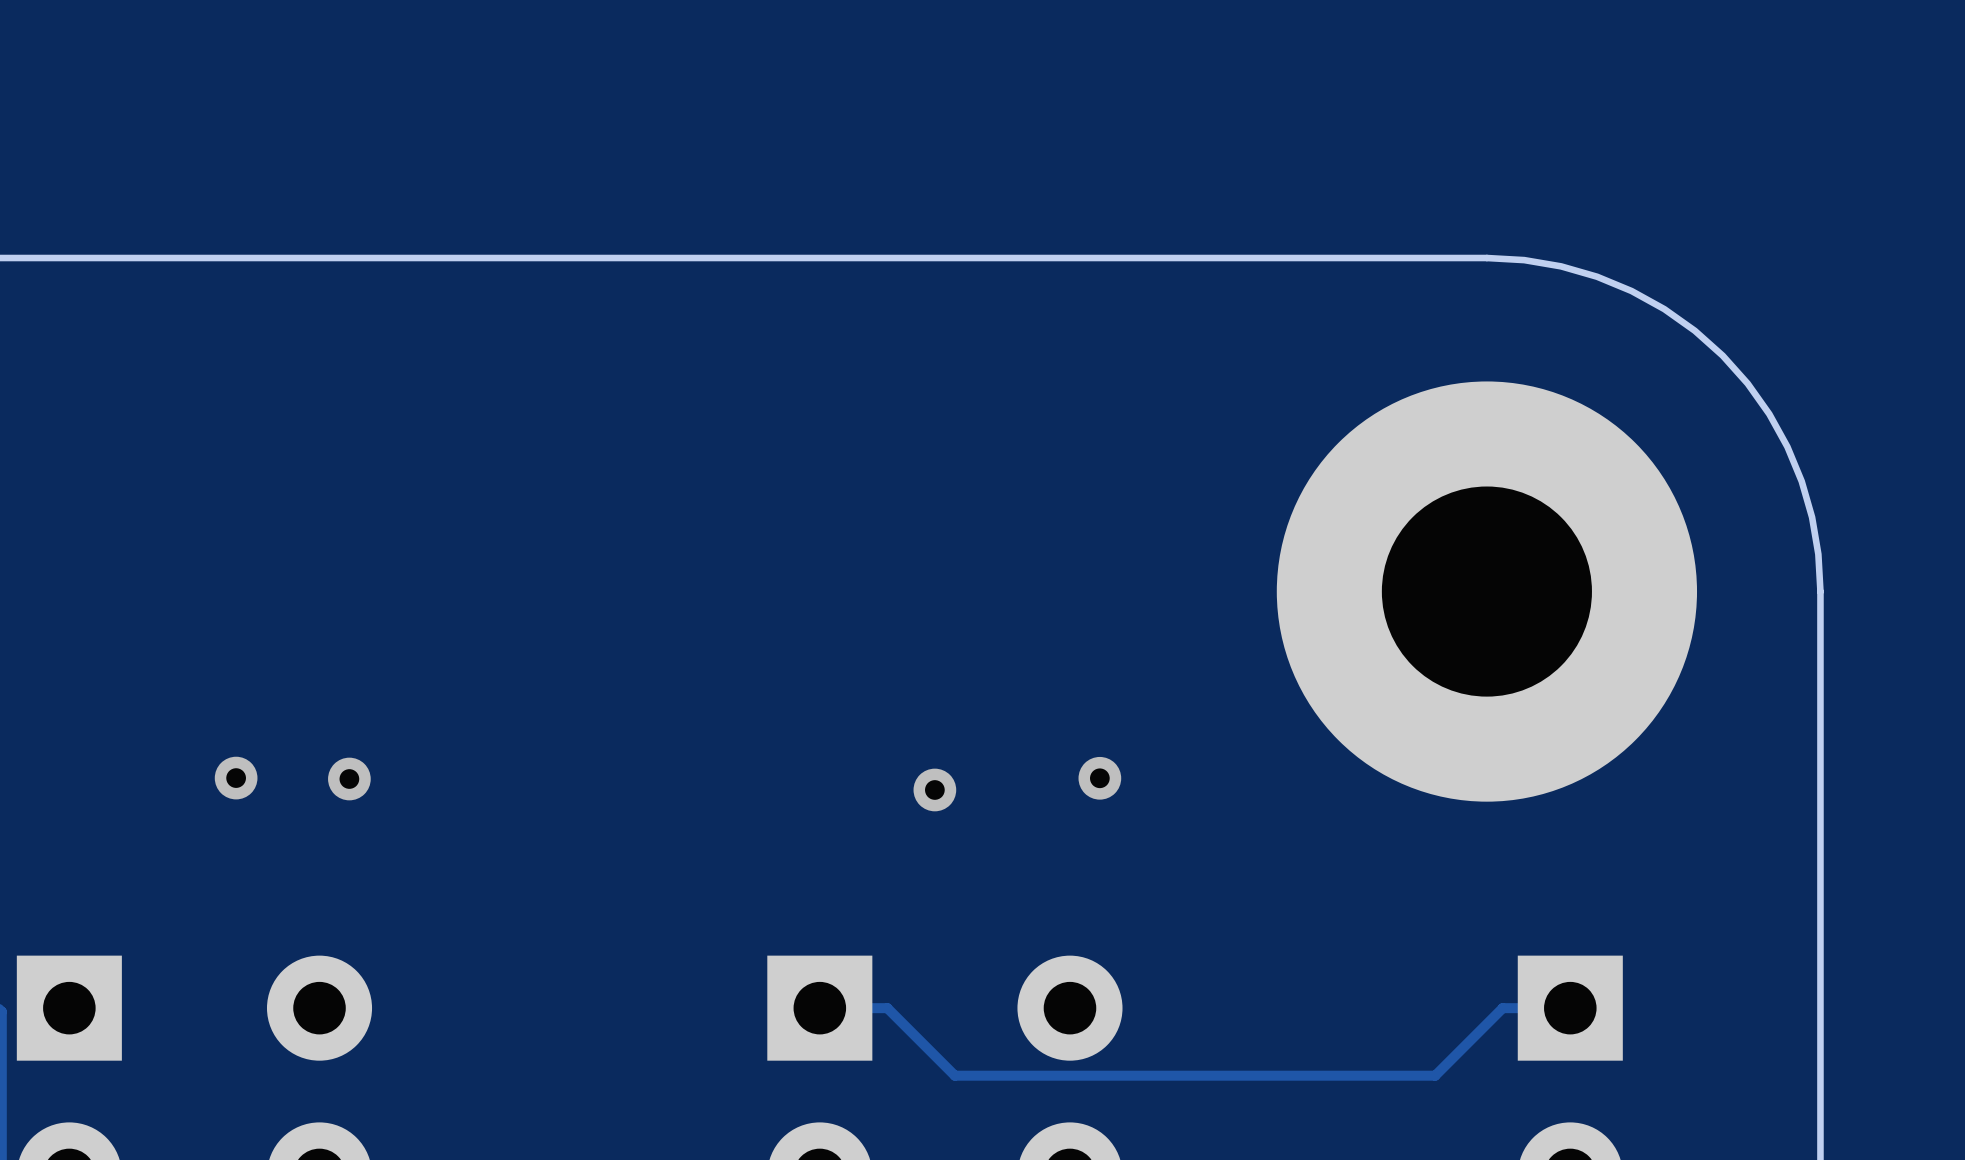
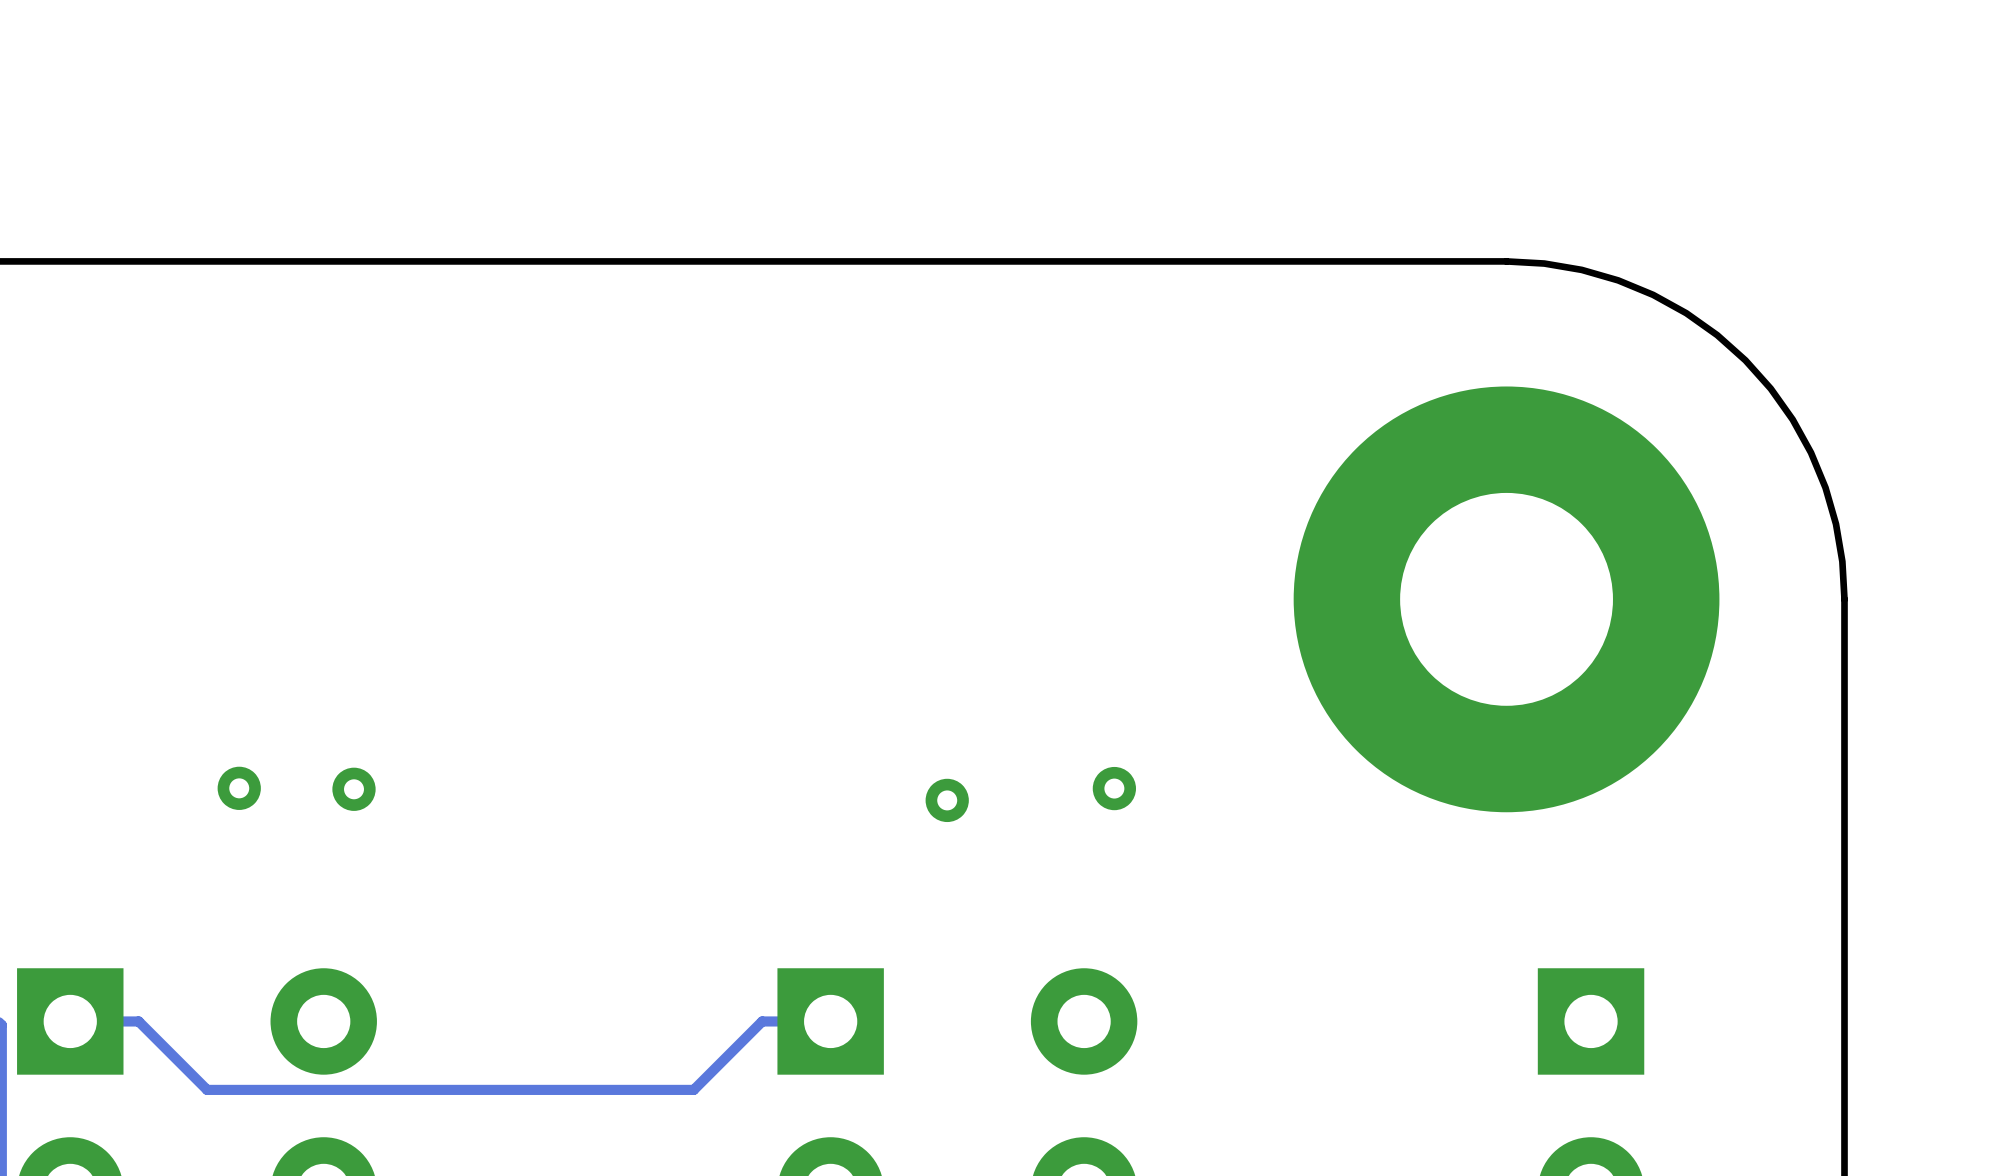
track: (1570, 1008) (1502, 1008) (1435, 1075) (954, 1075) (887, 1008) (819, 1008) -> (70, 1021) (138, 1021) (207, 1089) (693, 1089) (762, 1021) (830, 1021)

